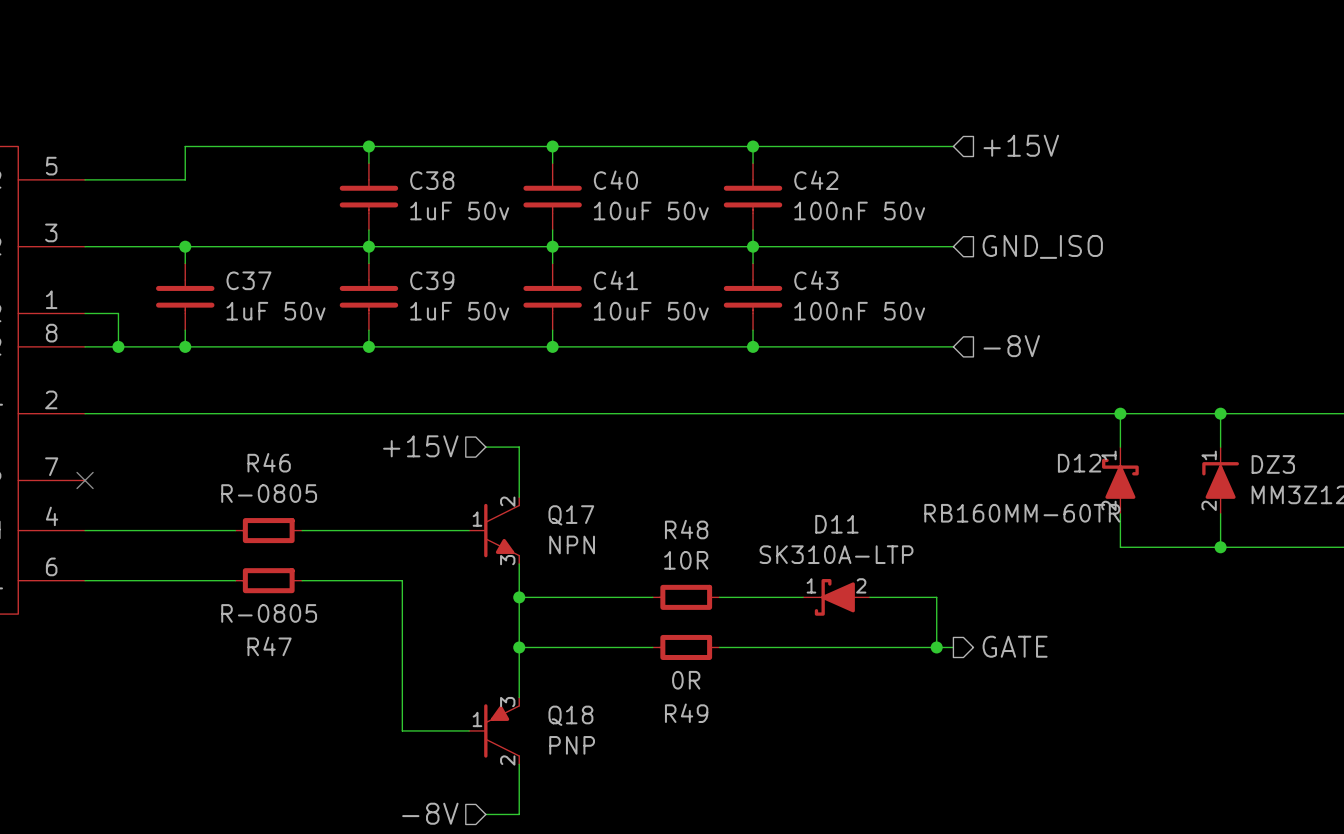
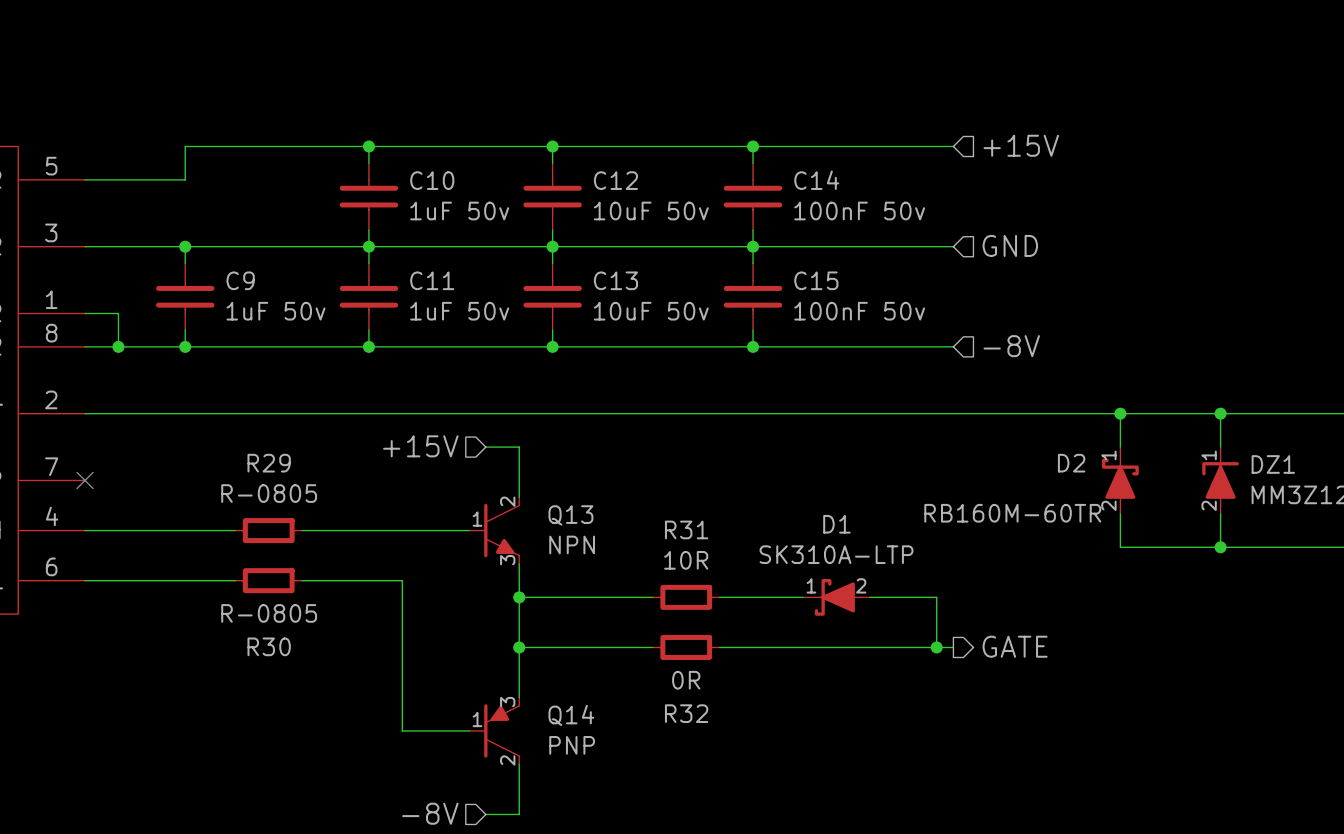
C38 name: C38 (432, 180) -> C10 (432, 180)
C40 name: C40 (615, 180) -> C12 (615, 180)
C42 name: C42 (816, 180) -> C14 (816, 180)
hierarchical label: GND_ISO (1042, 246) -> GND (1010, 245)
C37 name: C37 (248, 280) -> C9 (240, 280)
C39 name: C39 (432, 280) -> C11 (432, 280)
C41 name: C41 (615, 280) -> C13 (615, 280)
C43 name: C43 (816, 280) -> C15 (816, 280)
R46 name: R46 (269, 462) -> R29 (269, 463)
D12 name: D12 (1079, 463) -> D2 (1071, 463)
DZ3 name: DZ3 (1273, 464) -> DZ1 (1273, 464)
D12 value: RB160MM-60TR (1022, 513) -> RB160M-60TR (1012, 513)
Q17 name: Q17 (571, 515) -> Q13 (570, 515)
D11 name: D11 (836, 524) -> D1 (836, 524)
R48 name: R48 (686, 529) -> R31 (686, 529)
R47 name: R47 (269, 646) -> R30 (269, 646)
R49 name: R49 (686, 713) -> R32 (686, 713)
Q18 name: Q18 (570, 715) -> Q14 (571, 715)

